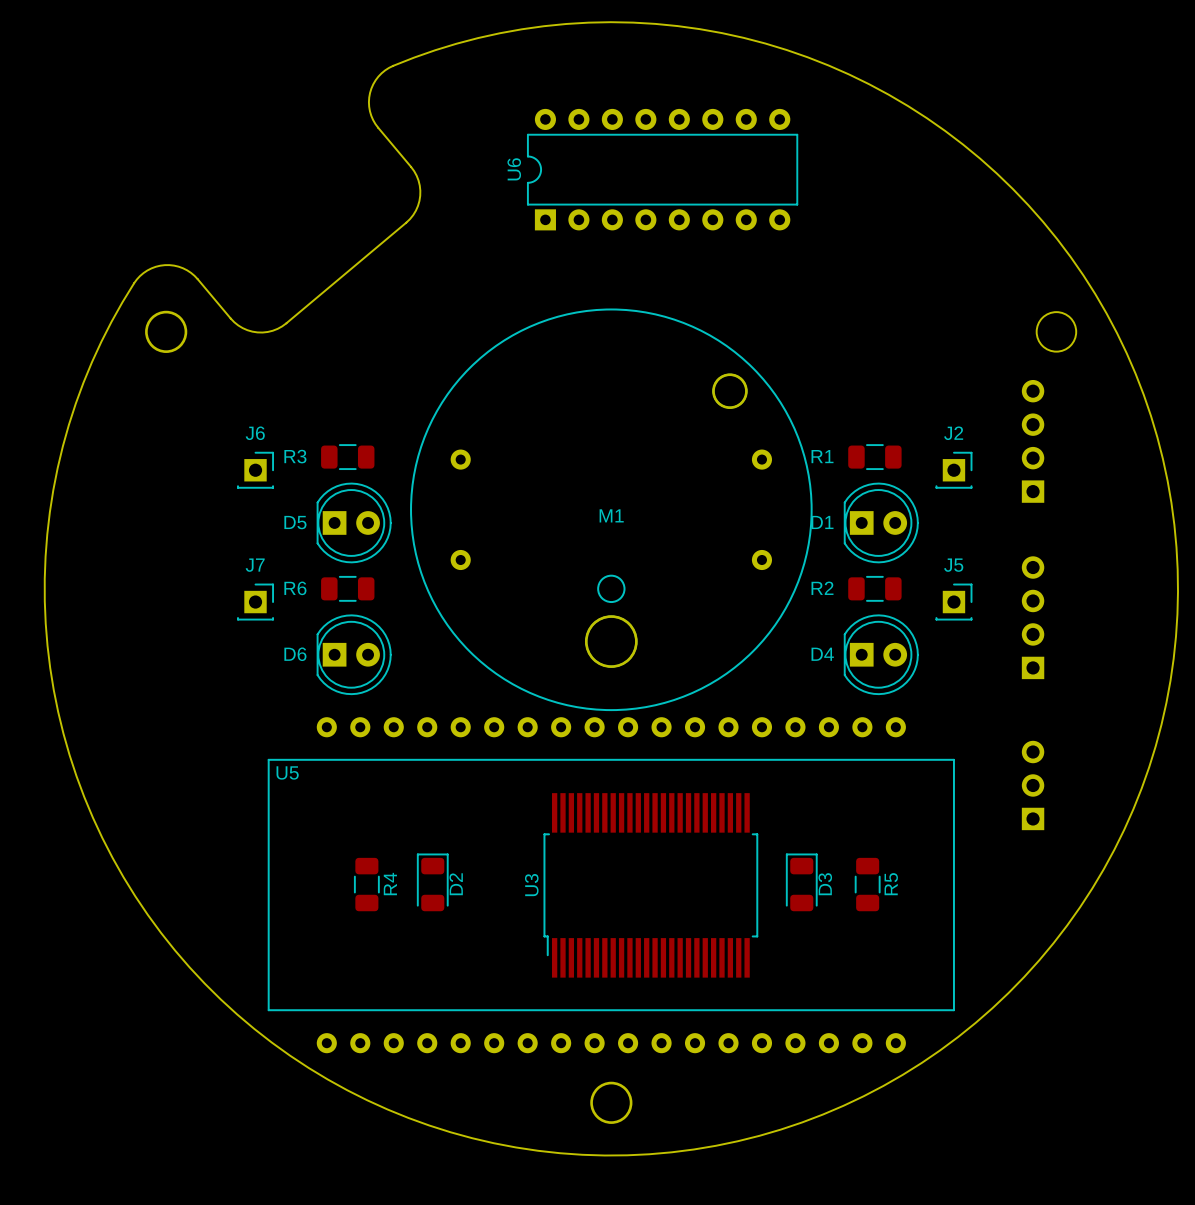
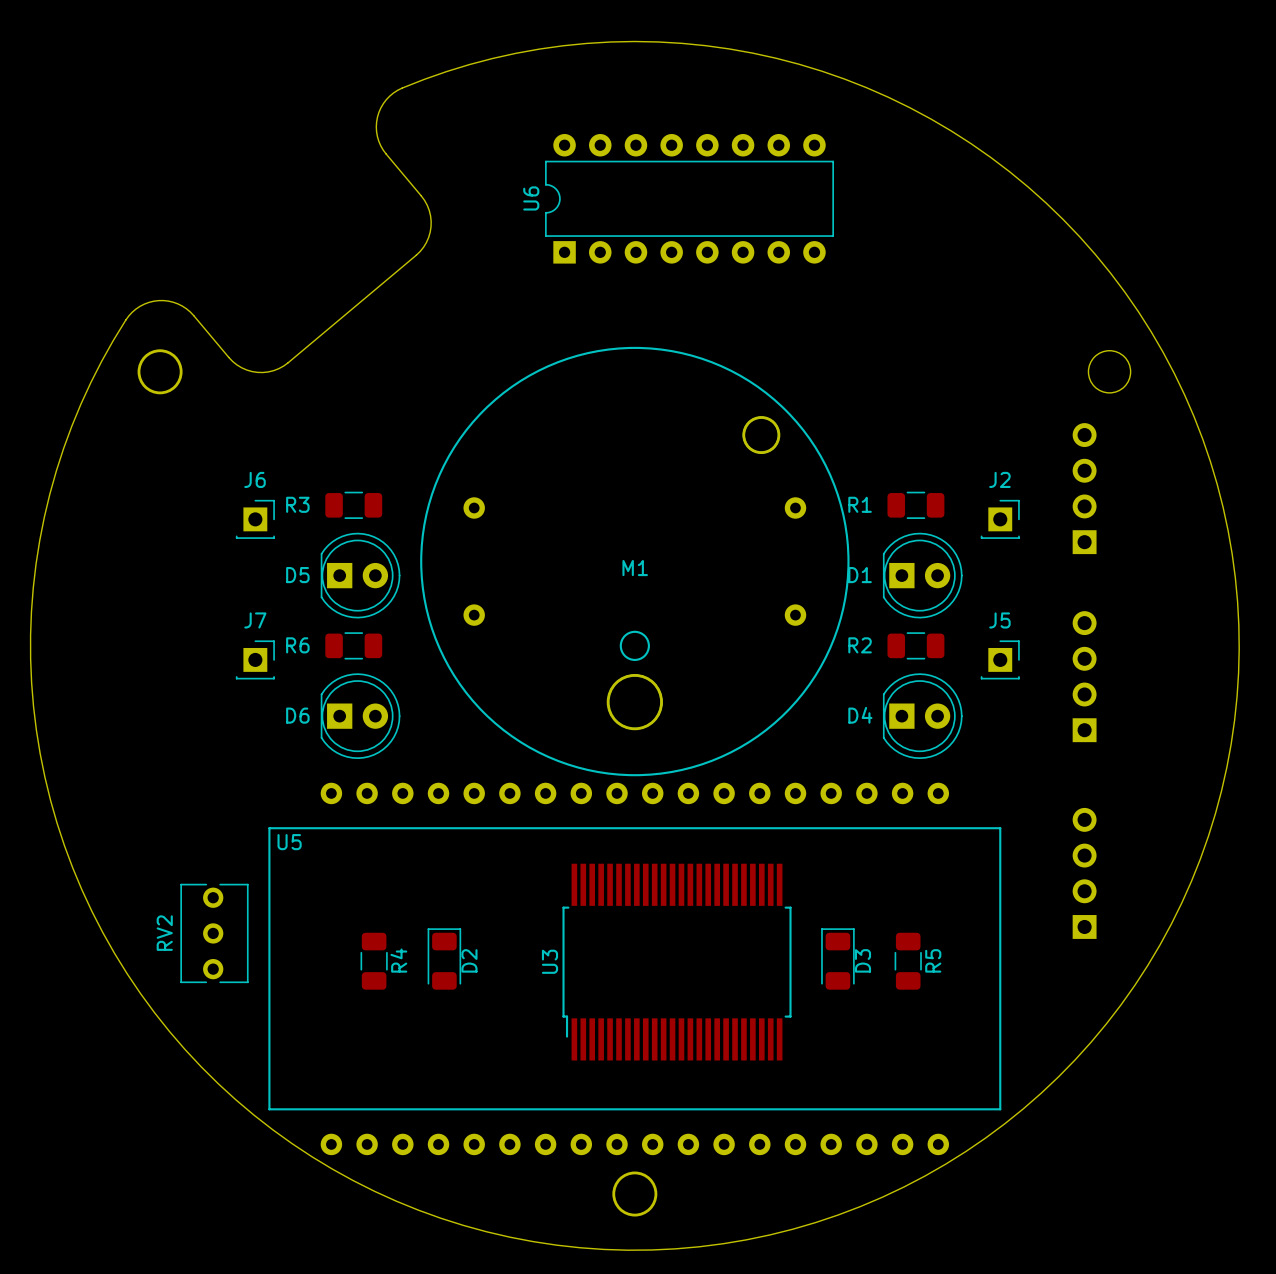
U5 footprint: [267, 717, 955, 1054] -> [268, 782, 1002, 1156]
part: (1033, 785) -> none
part: none -> (1084, 873)
RV2: none -> (214, 933)

